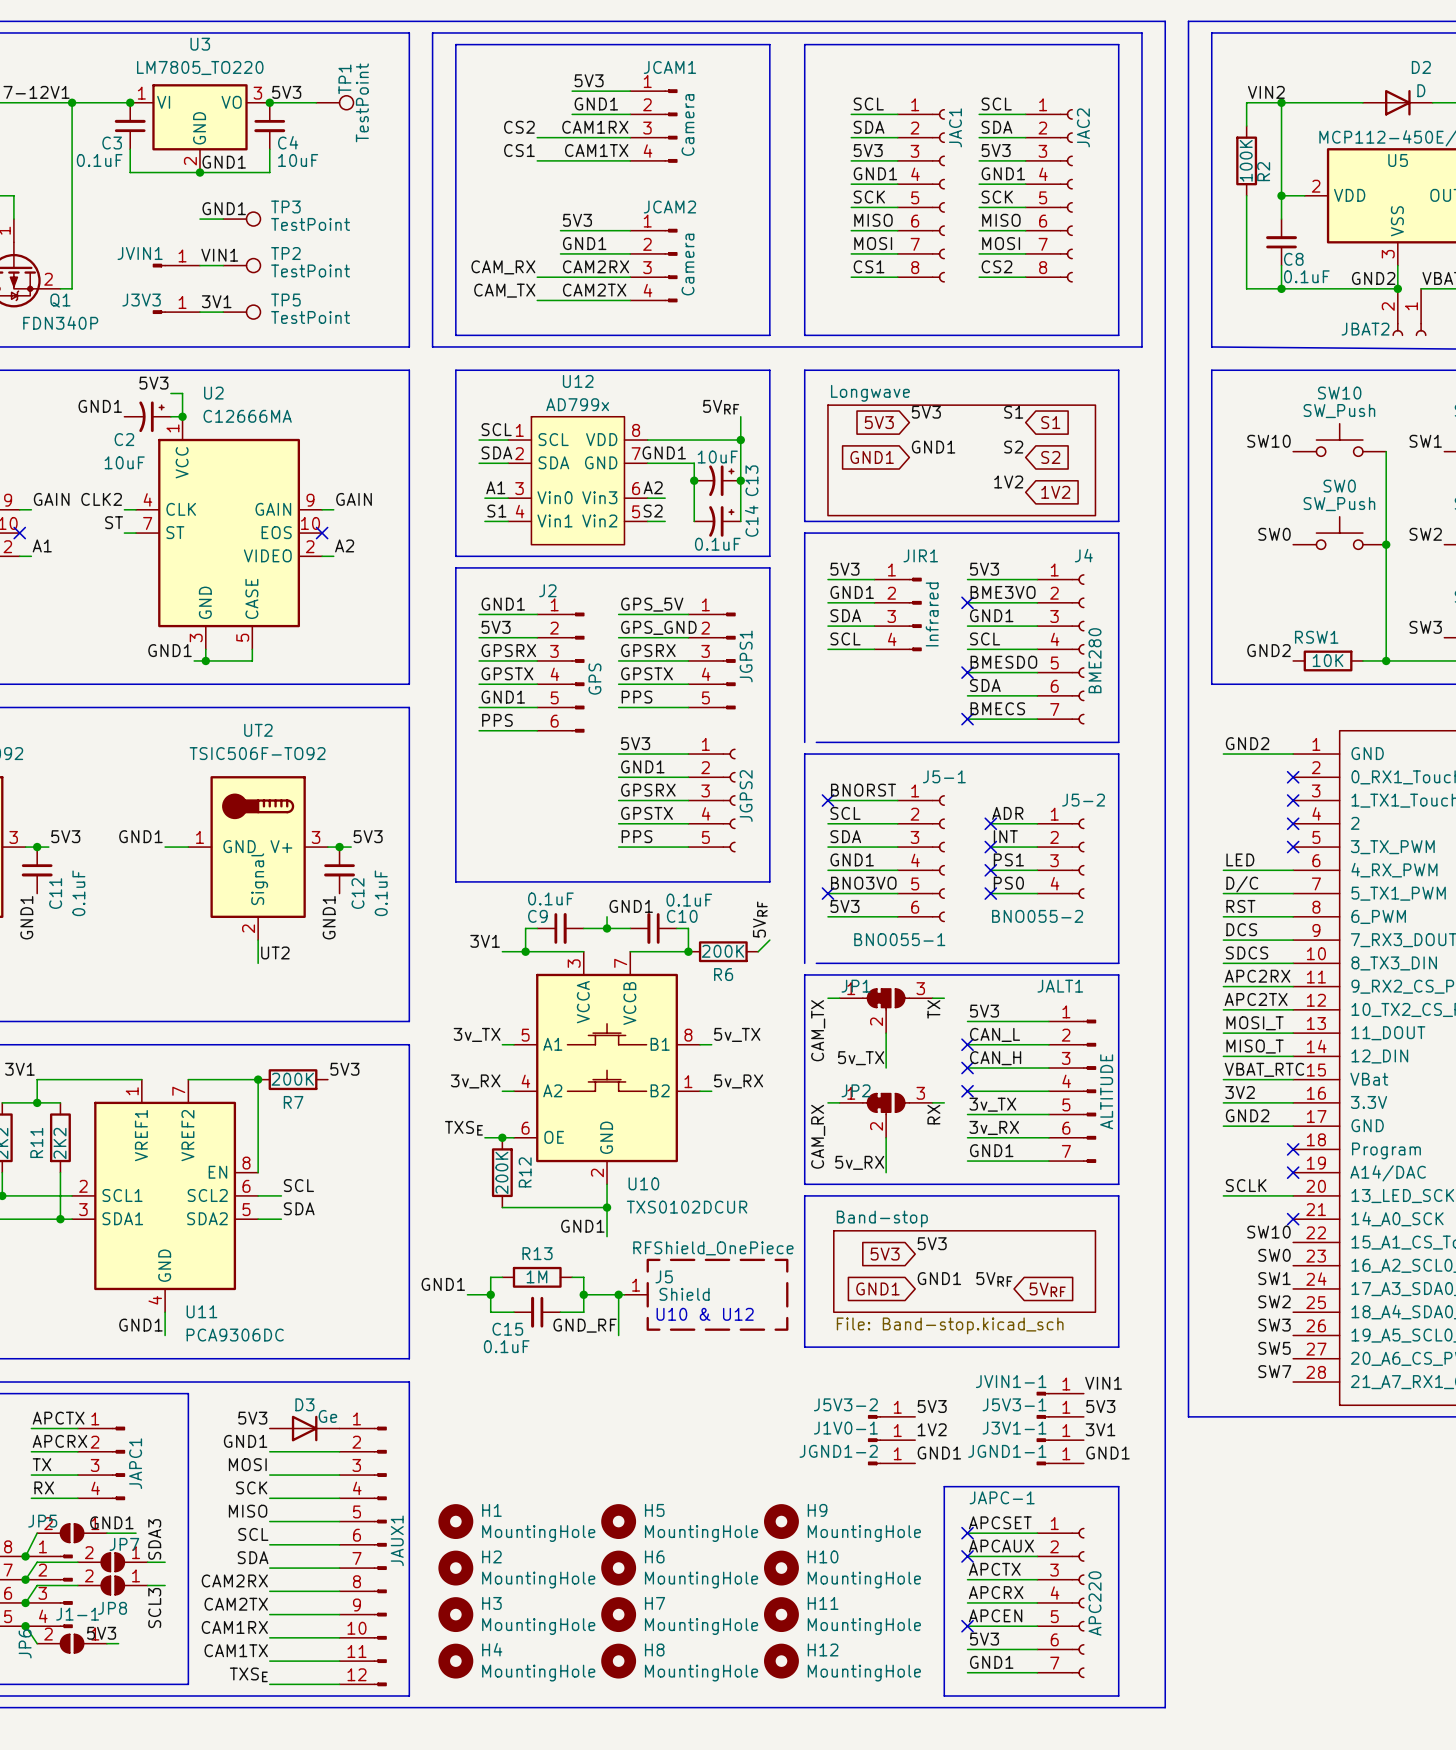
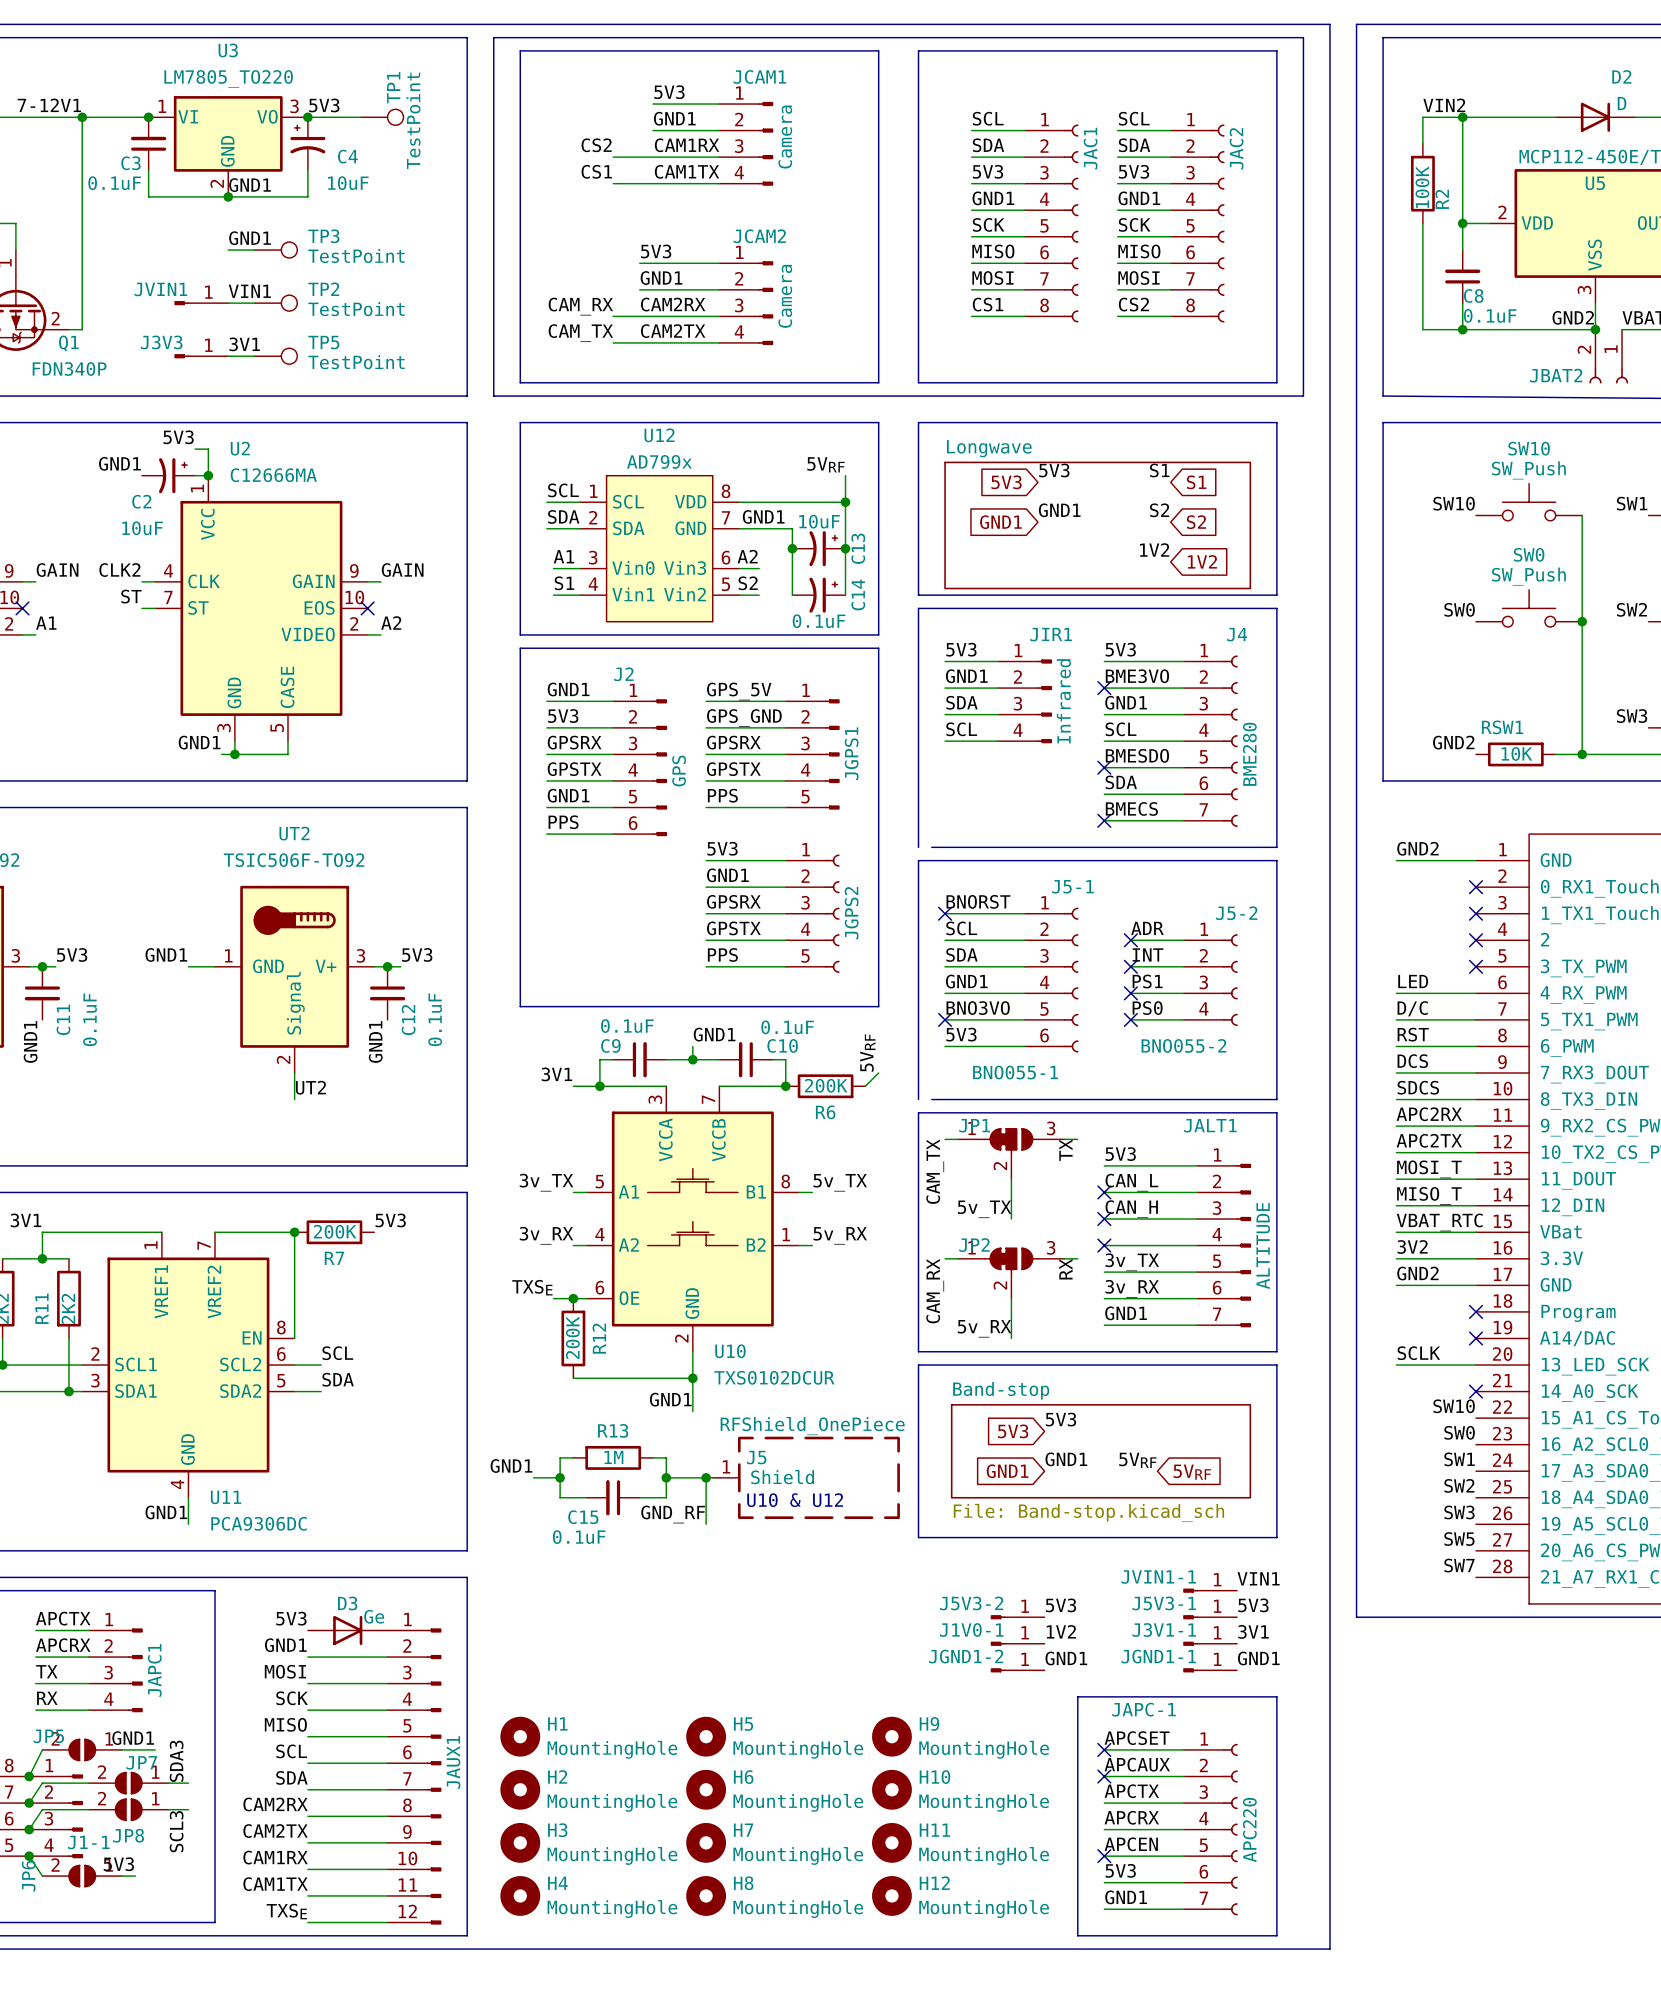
C4 symbol: [254, 102, 286, 150] -> [290, 117, 326, 171]

